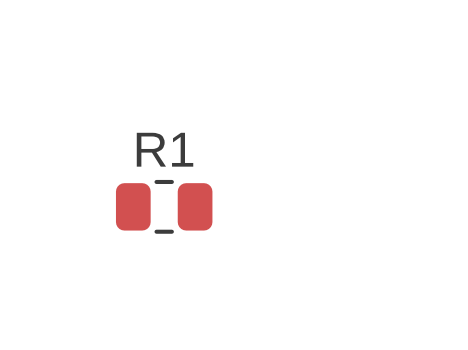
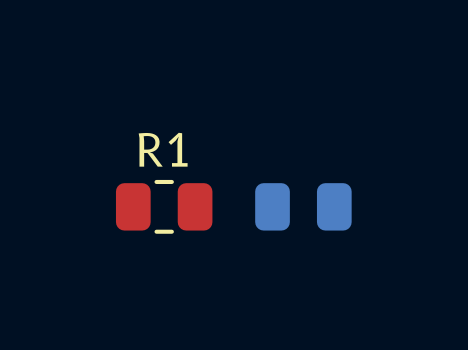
part: none -> (303, 206)

